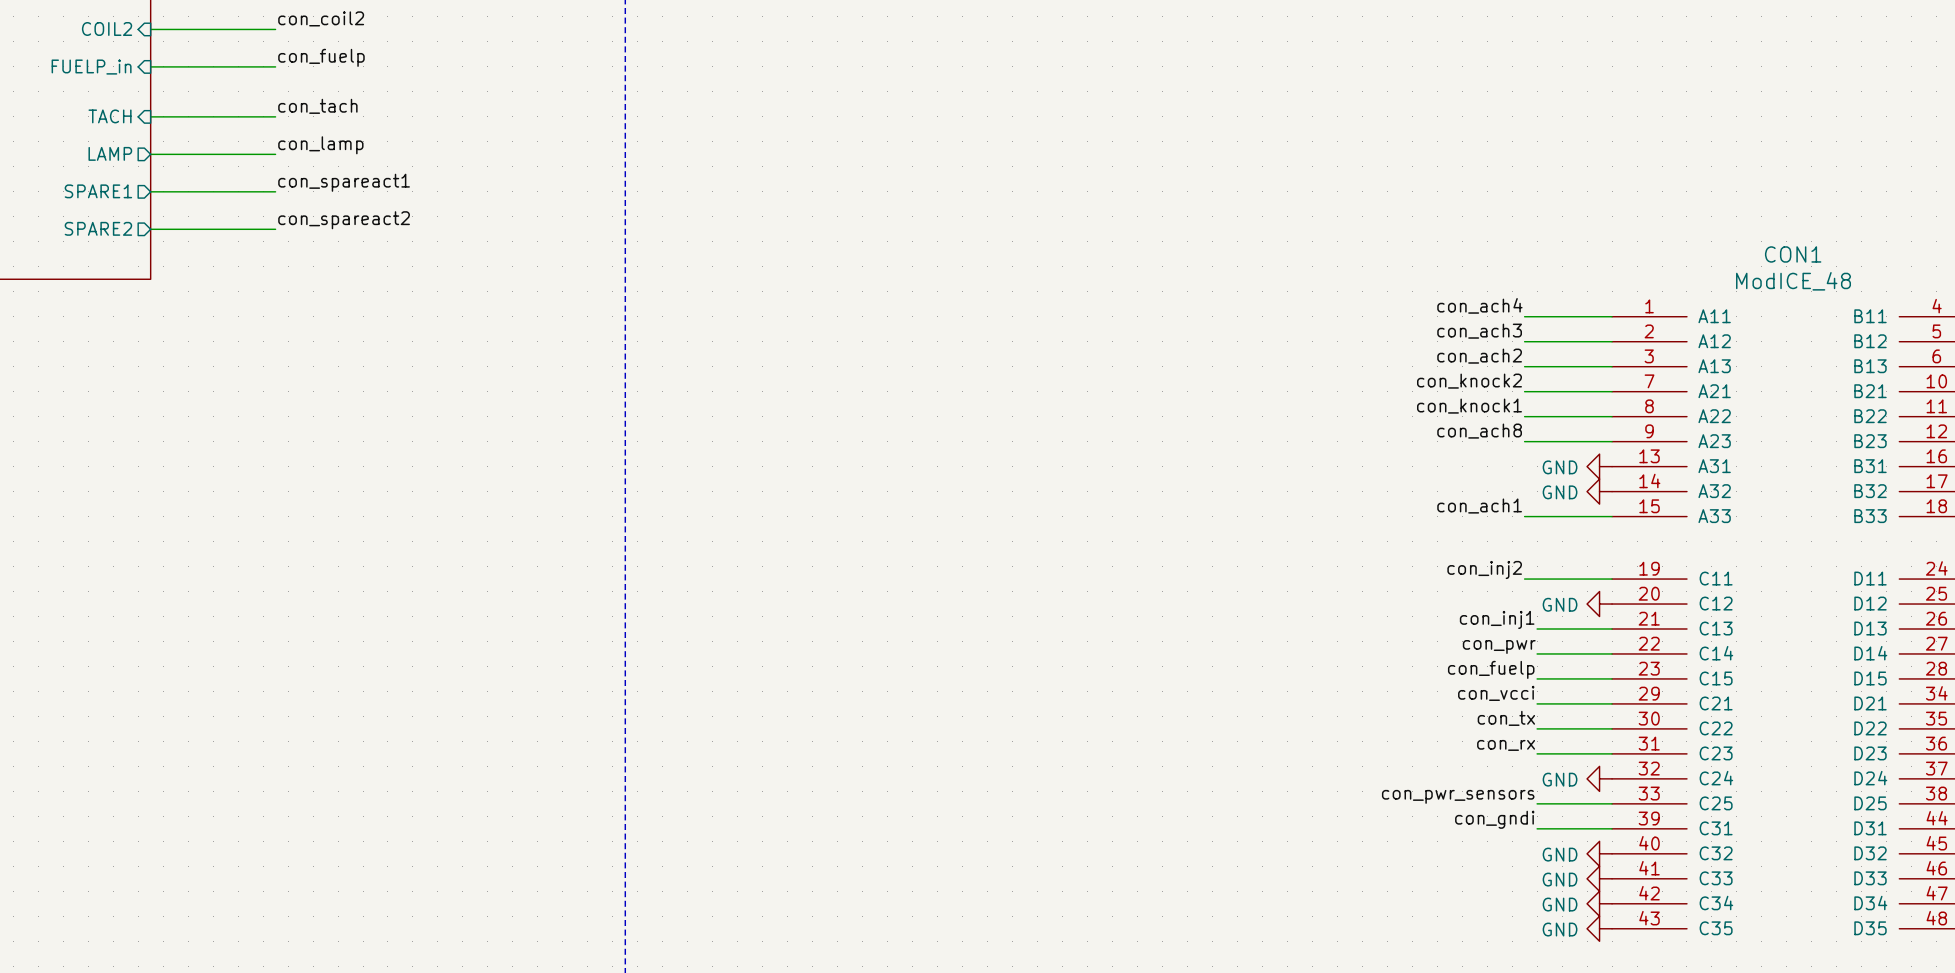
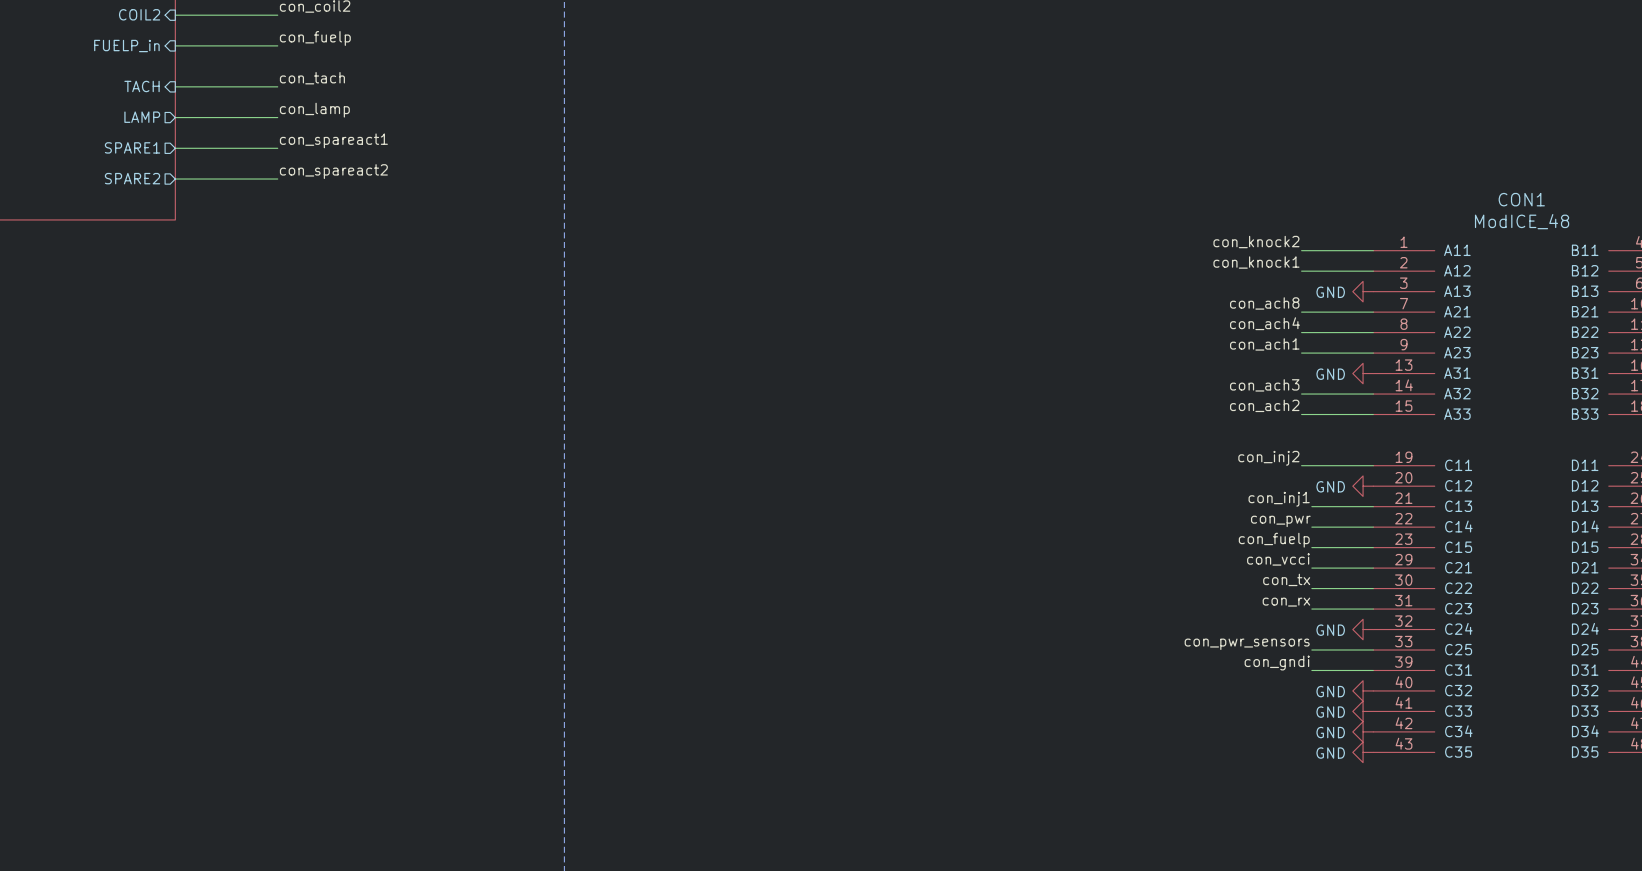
label: con_ach4 (1479, 305) -> con_knock2 (1256, 242)
label: con_ach3 (1479, 331) -> con_knock1 (1256, 262)
label: con_ach2 (1479, 356) -> none
wire: (1524, 366) (1612, 366) -> (1301, 394) (1373, 394)
label: con_knock2 (1469, 381) -> con_ach8 (1264, 303)
label: con_knock1 (1469, 406) -> con_ach4 (1264, 323)
label: con_ach8 (1479, 431) -> con_ach1 (1264, 344)
label: none -> con_ach3 (1264, 385)
power symbol position: GND (1599, 491) -> GND (1363, 291)
label: con_ach1 (1479, 506) -> con_ach2 (1264, 405)

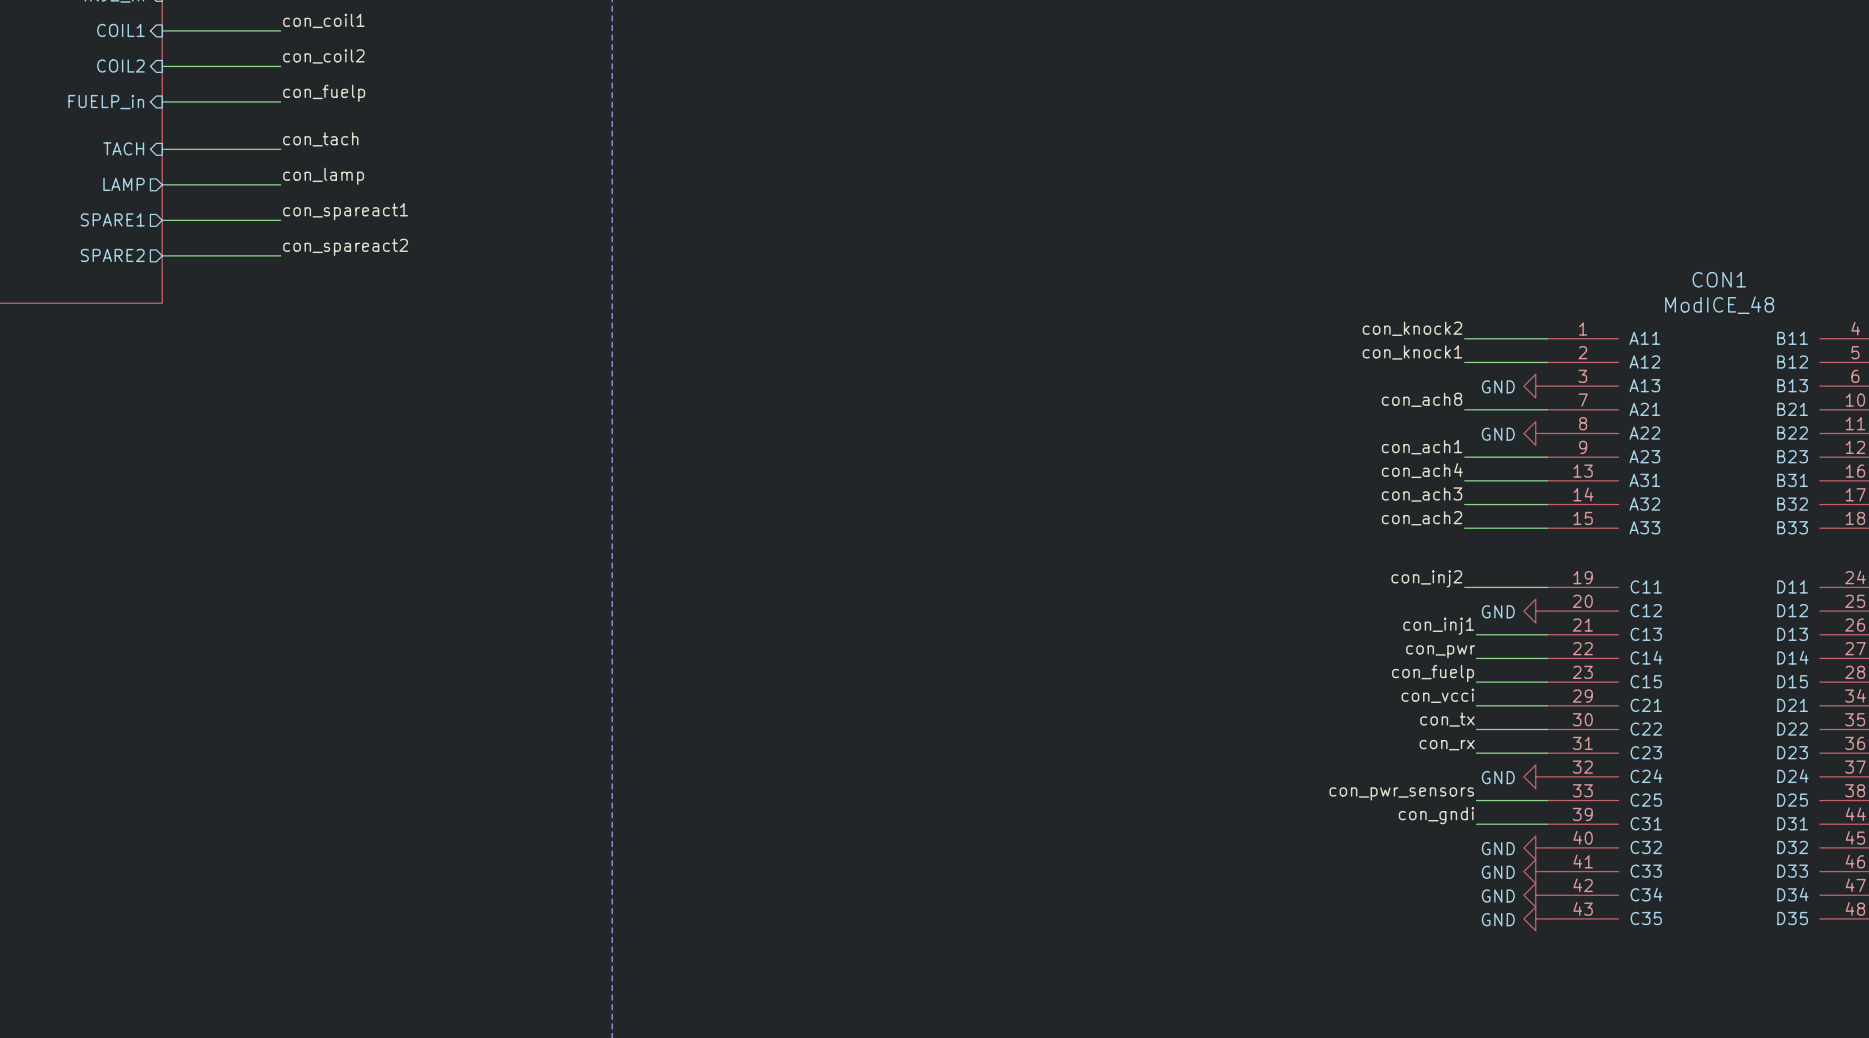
label position: con_ach4 (1264, 323) -> con_ach4 (1422, 470)
wire: (1301, 332) (1373, 332) -> (1464, 480) (1547, 480)
power symbol position: GND (1363, 373) -> GND (1535, 433)

